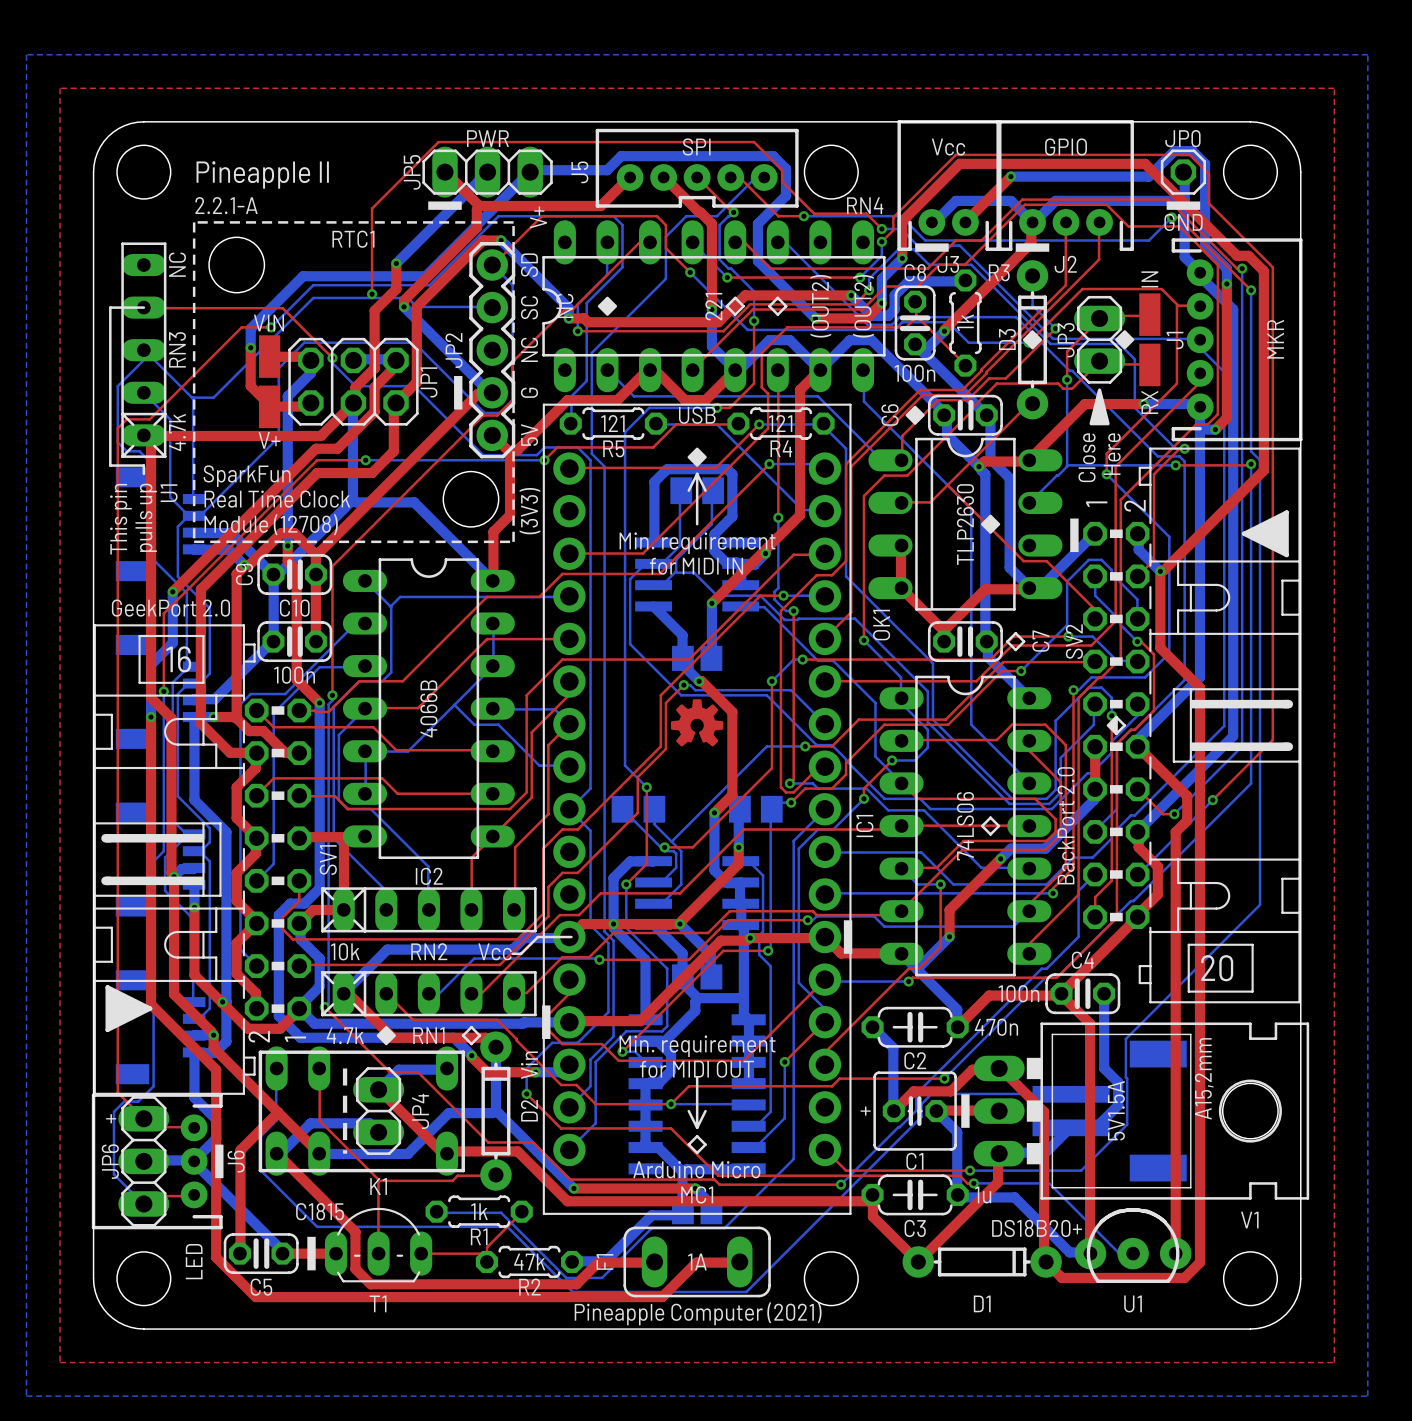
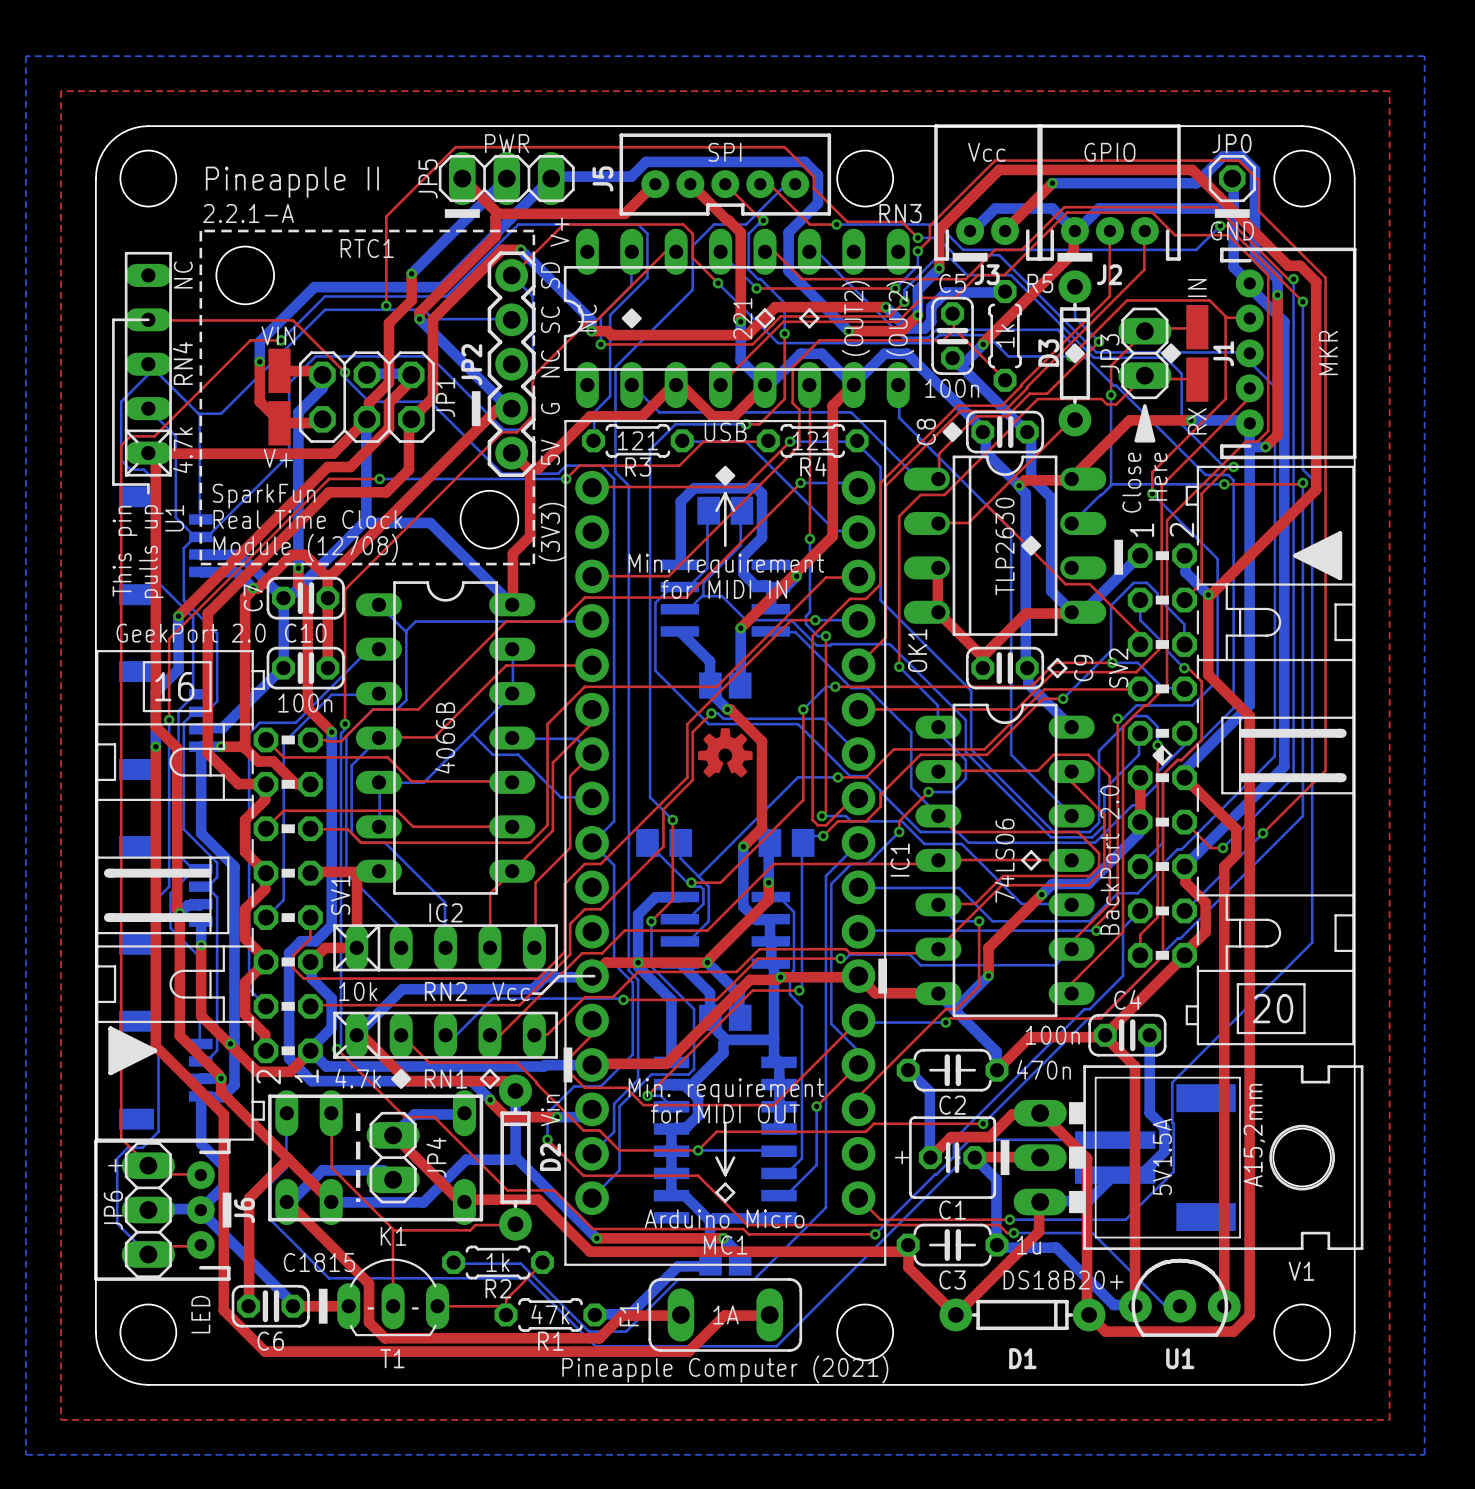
RN4 name: RN4 (865, 205) -> RN3 (900, 213)
C8 name: C8 (915, 272) -> C5 (952, 283)
R3 name: R3 (999, 272) -> R5 (1040, 283)
RN3 name: RN3 (177, 349) -> RN4 (182, 363)
C6 name: C6 (889, 415) -> C8 (926, 432)
R5 name: R5 (613, 448) -> R3 (638, 467)
C9 name: C9 (244, 574) -> C7 (253, 597)
C7 name: C7 (1040, 641) -> C9 (1083, 668)
R1 name: R1 (479, 1236) -> R2 (498, 1288)
C5 name: C5 (261, 1287) -> C6 (270, 1341)
R2 name: R2 (529, 1287) -> R1 (550, 1341)

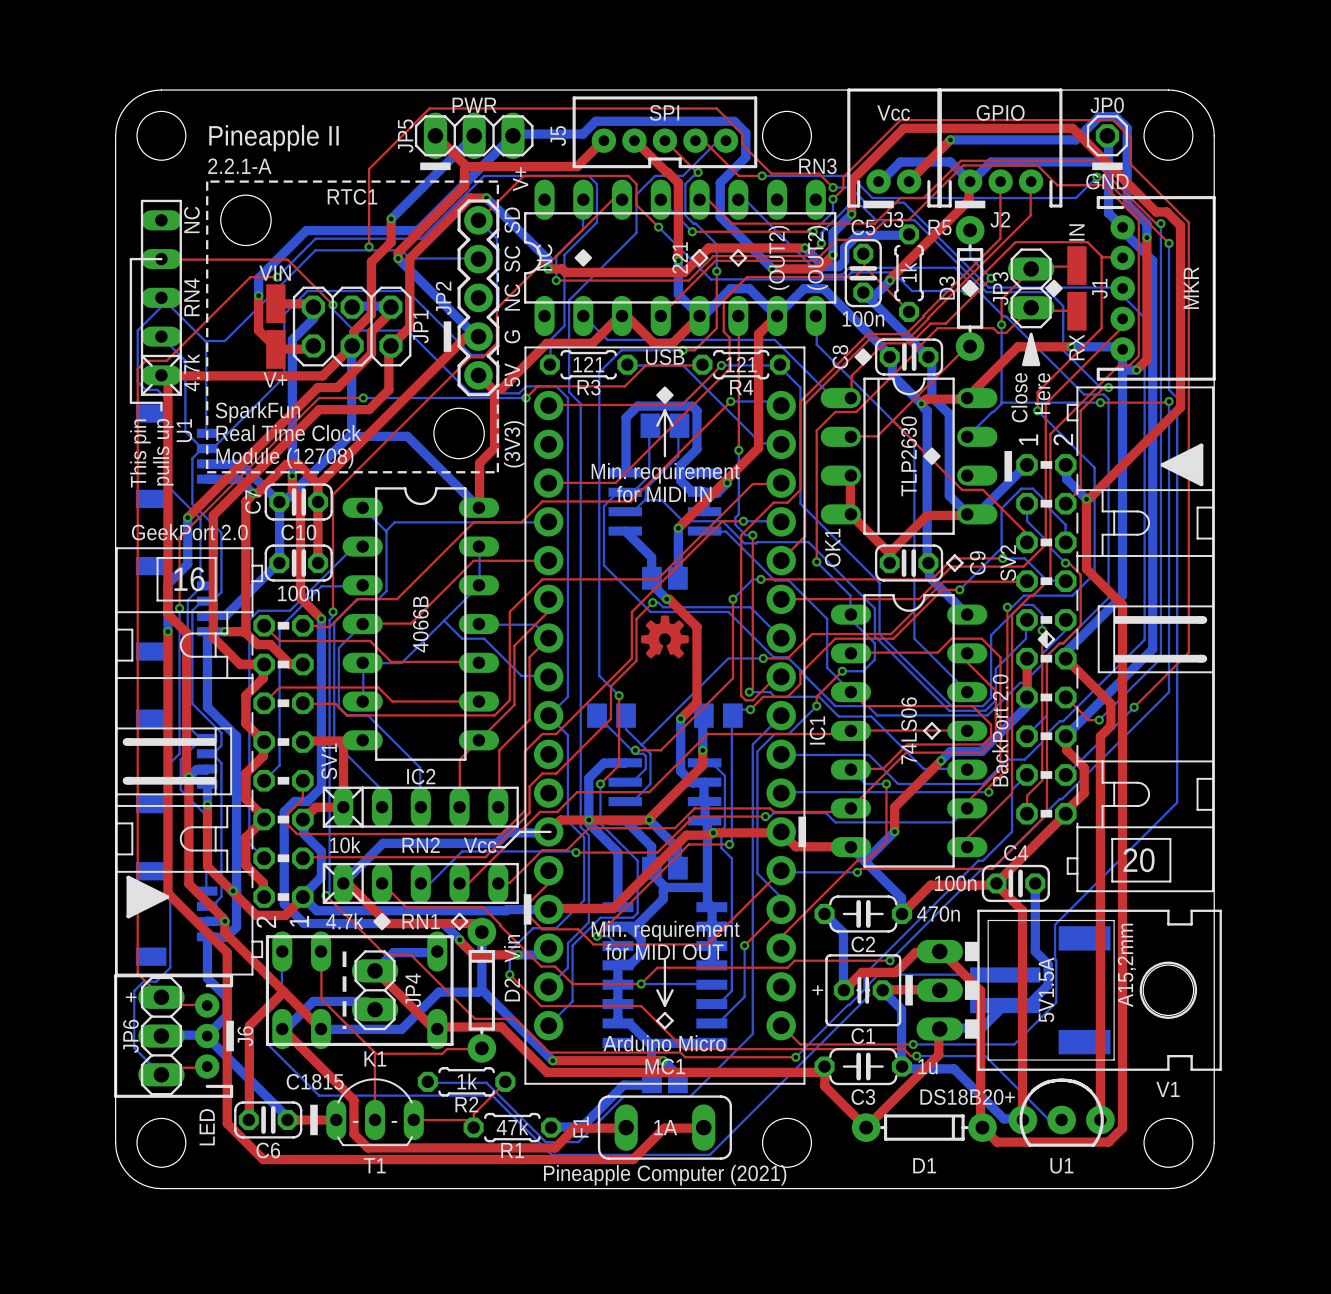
bottom zone outline: (25, 56) (1424, 56) (1424, 1454) (25, 1454) (25, 56) -> none
top zone outline: (60, 91) (1389, 91) (1389, 1419) (60, 1419) (60, 91) -> none

